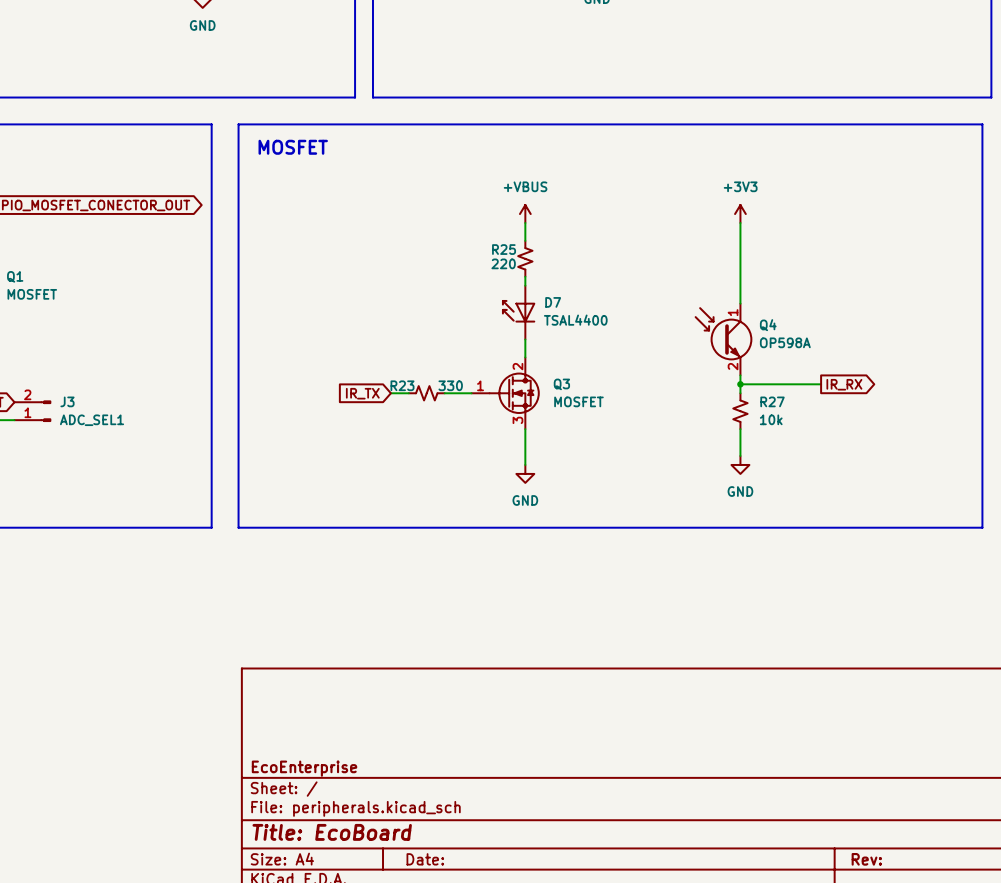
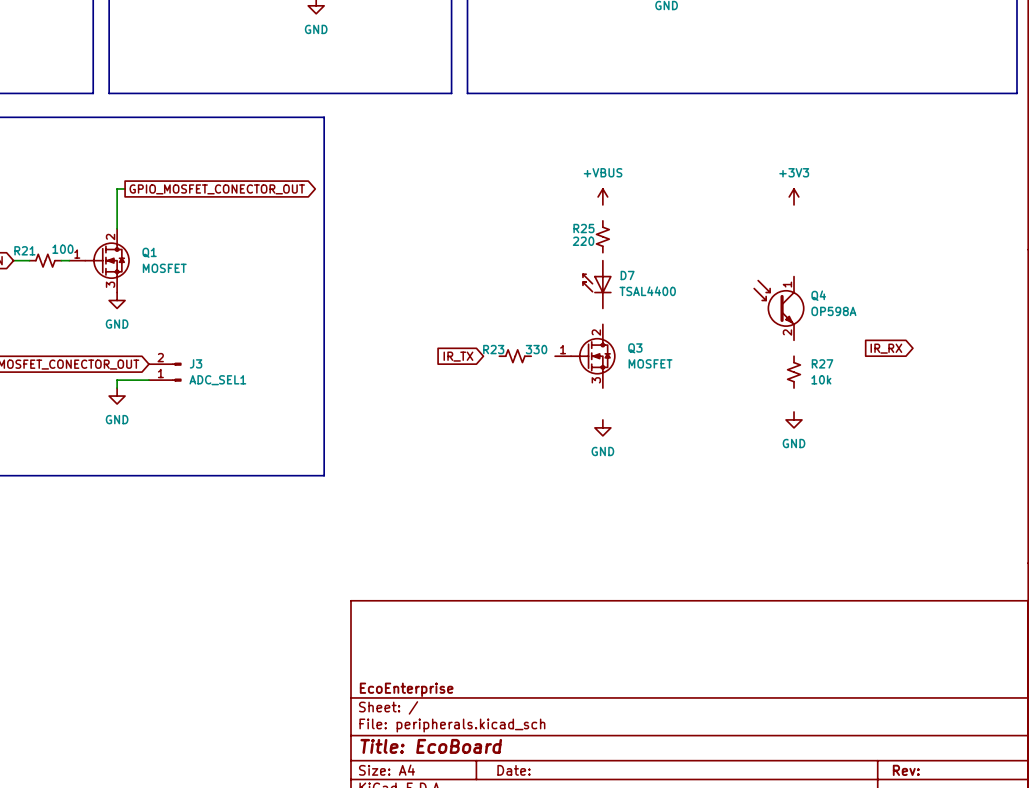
line: (238, 124) (982, 124) (982, 527) (238, 527) (238, 124) -> none
text: MOSFET (293, 147) -> none
wire: (525, 222) (525, 240) -> none
wire: (740, 222) (740, 303) -> none
wire: (525, 276) (525, 285) -> none
wire: (525, 339) (525, 357) -> none
wire: (740, 375) (740, 393) -> none
wire: (740, 384) (821, 384) -> none
junction: (740, 384) -> none
wire: (390, 393) (408, 393) -> none
wire: (444, 393) (471, 393) -> none
wire: (525, 429) (525, 464) -> none
wire: (740, 429) (740, 456) -> none

